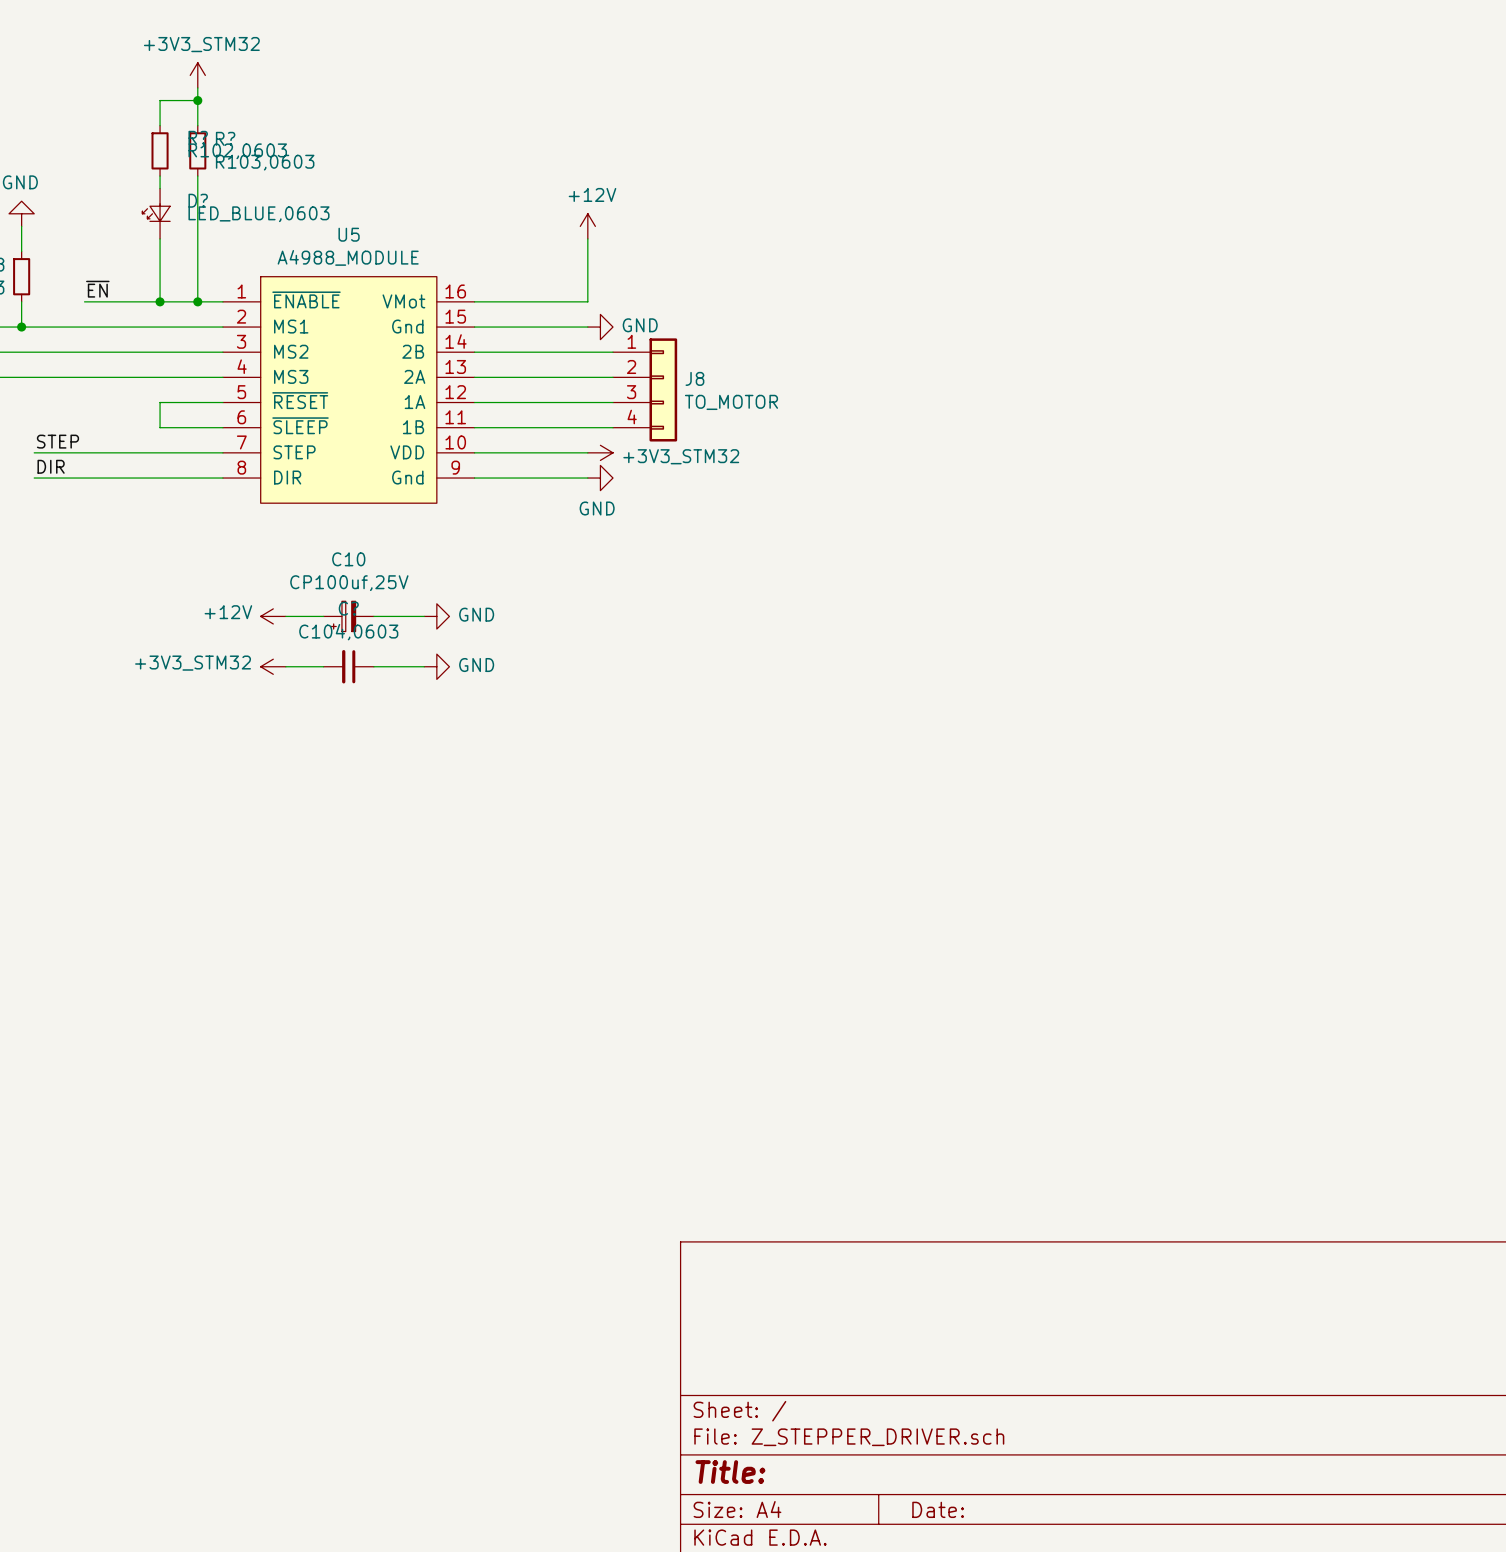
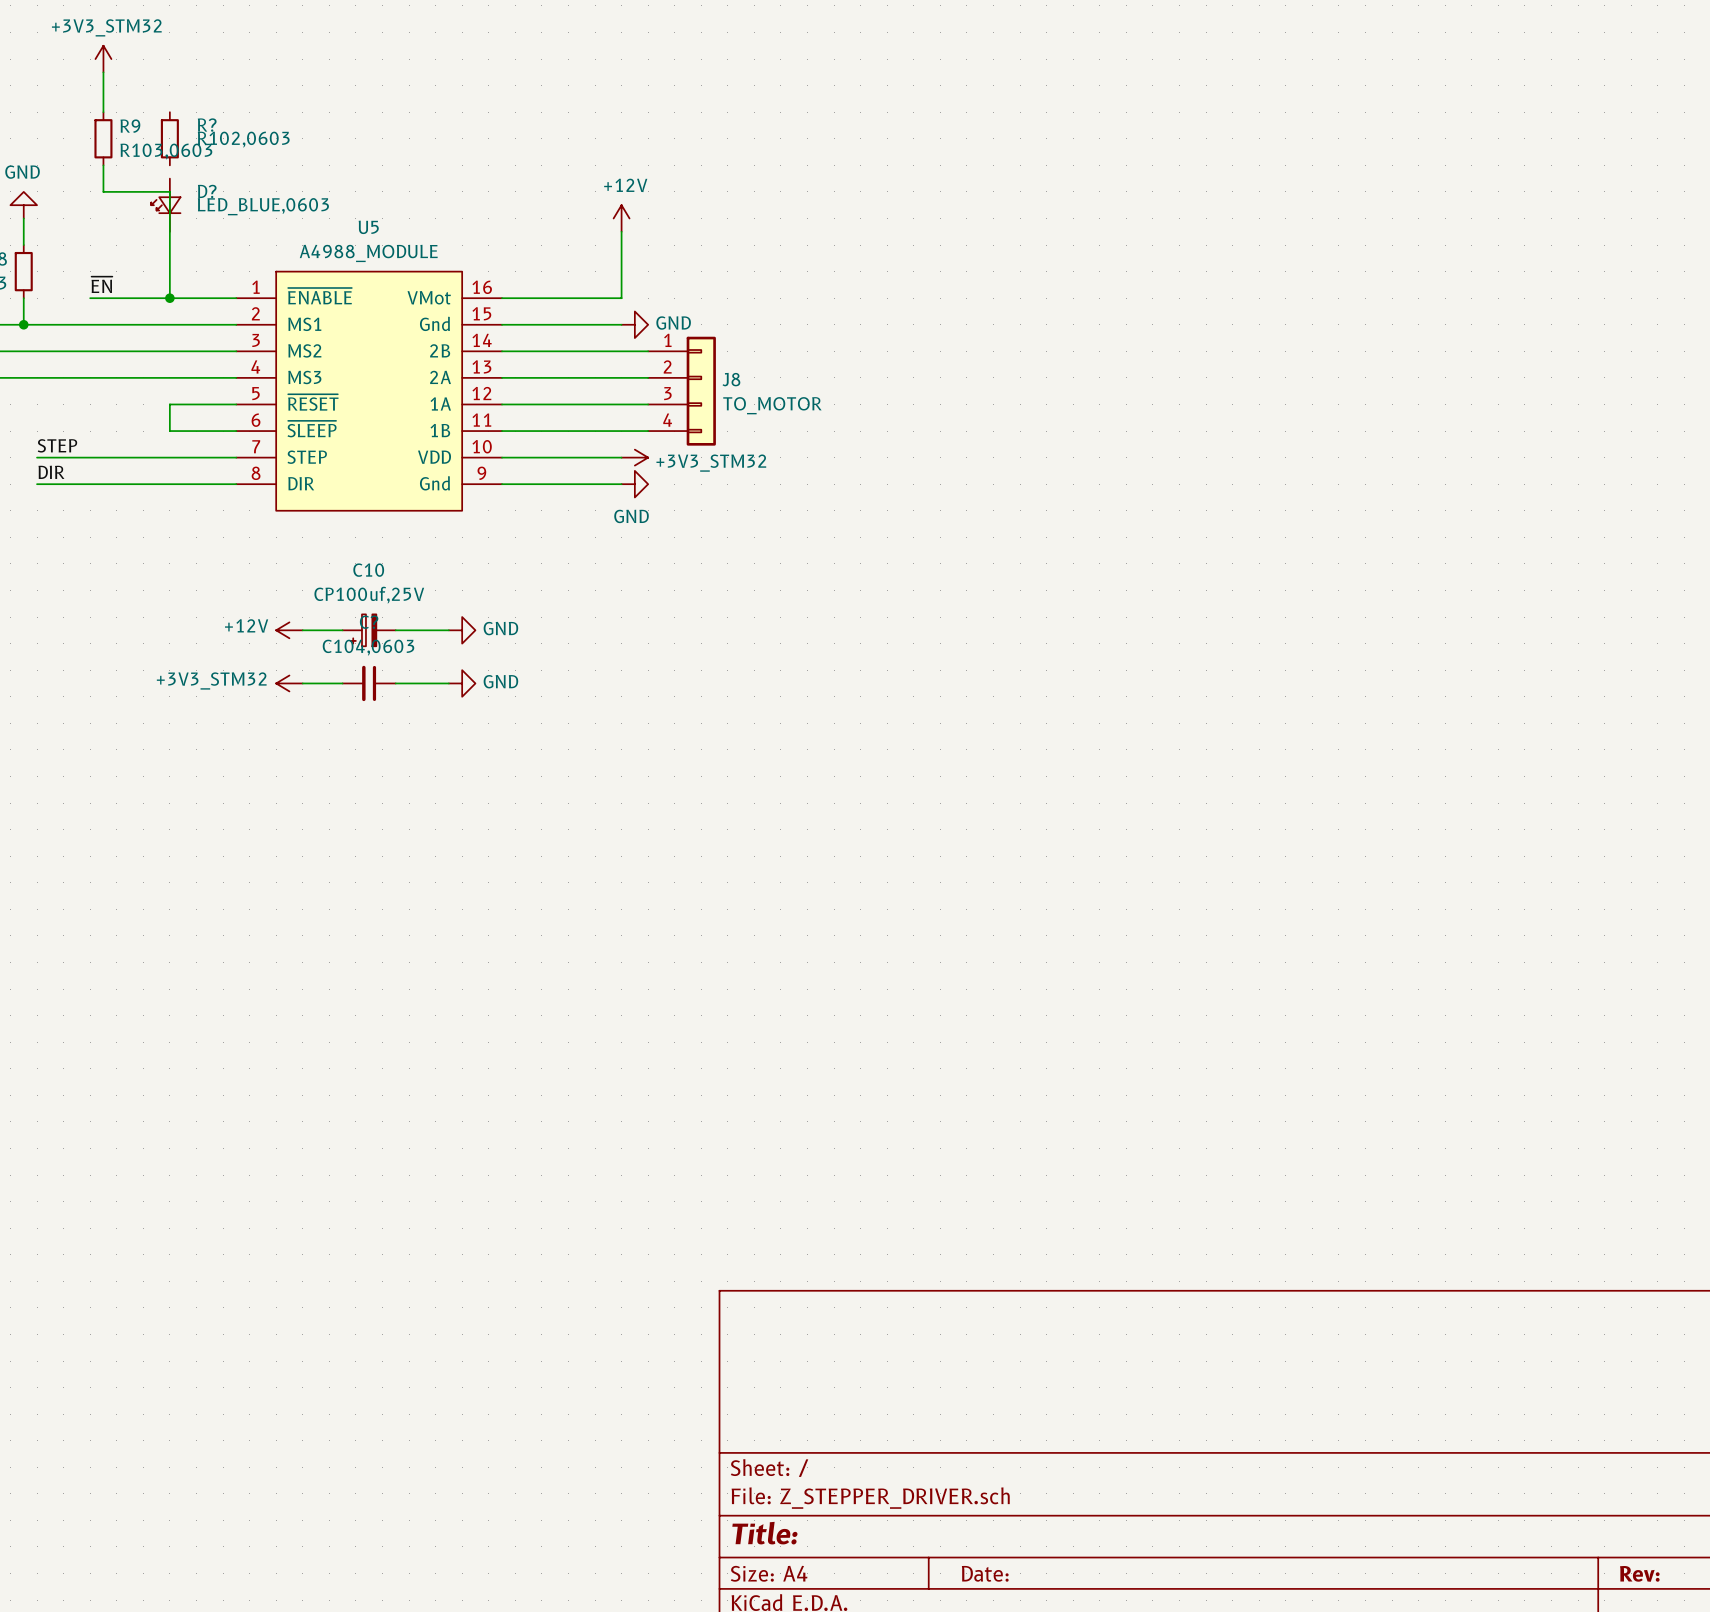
power symbol position: +3V3_STM32 (197, 75) -> +3V3_STM32 (103, 59)
wire: (197, 87) (197, 125) -> (103, 72) (103, 112)
wire: (197, 100) (160, 100) (160, 125) -> none
junction: (197, 100) -> none
R9: none -> R103,0603 (103, 138)
R?: R103,0603 (197, 150) -> none
wire: none -> (103, 165) (103, 191) (169, 191) (169, 231)
wire: (160, 176) (160, 188) -> none
wire: (197, 176) (197, 301) -> none
junction: (197, 301) -> none

